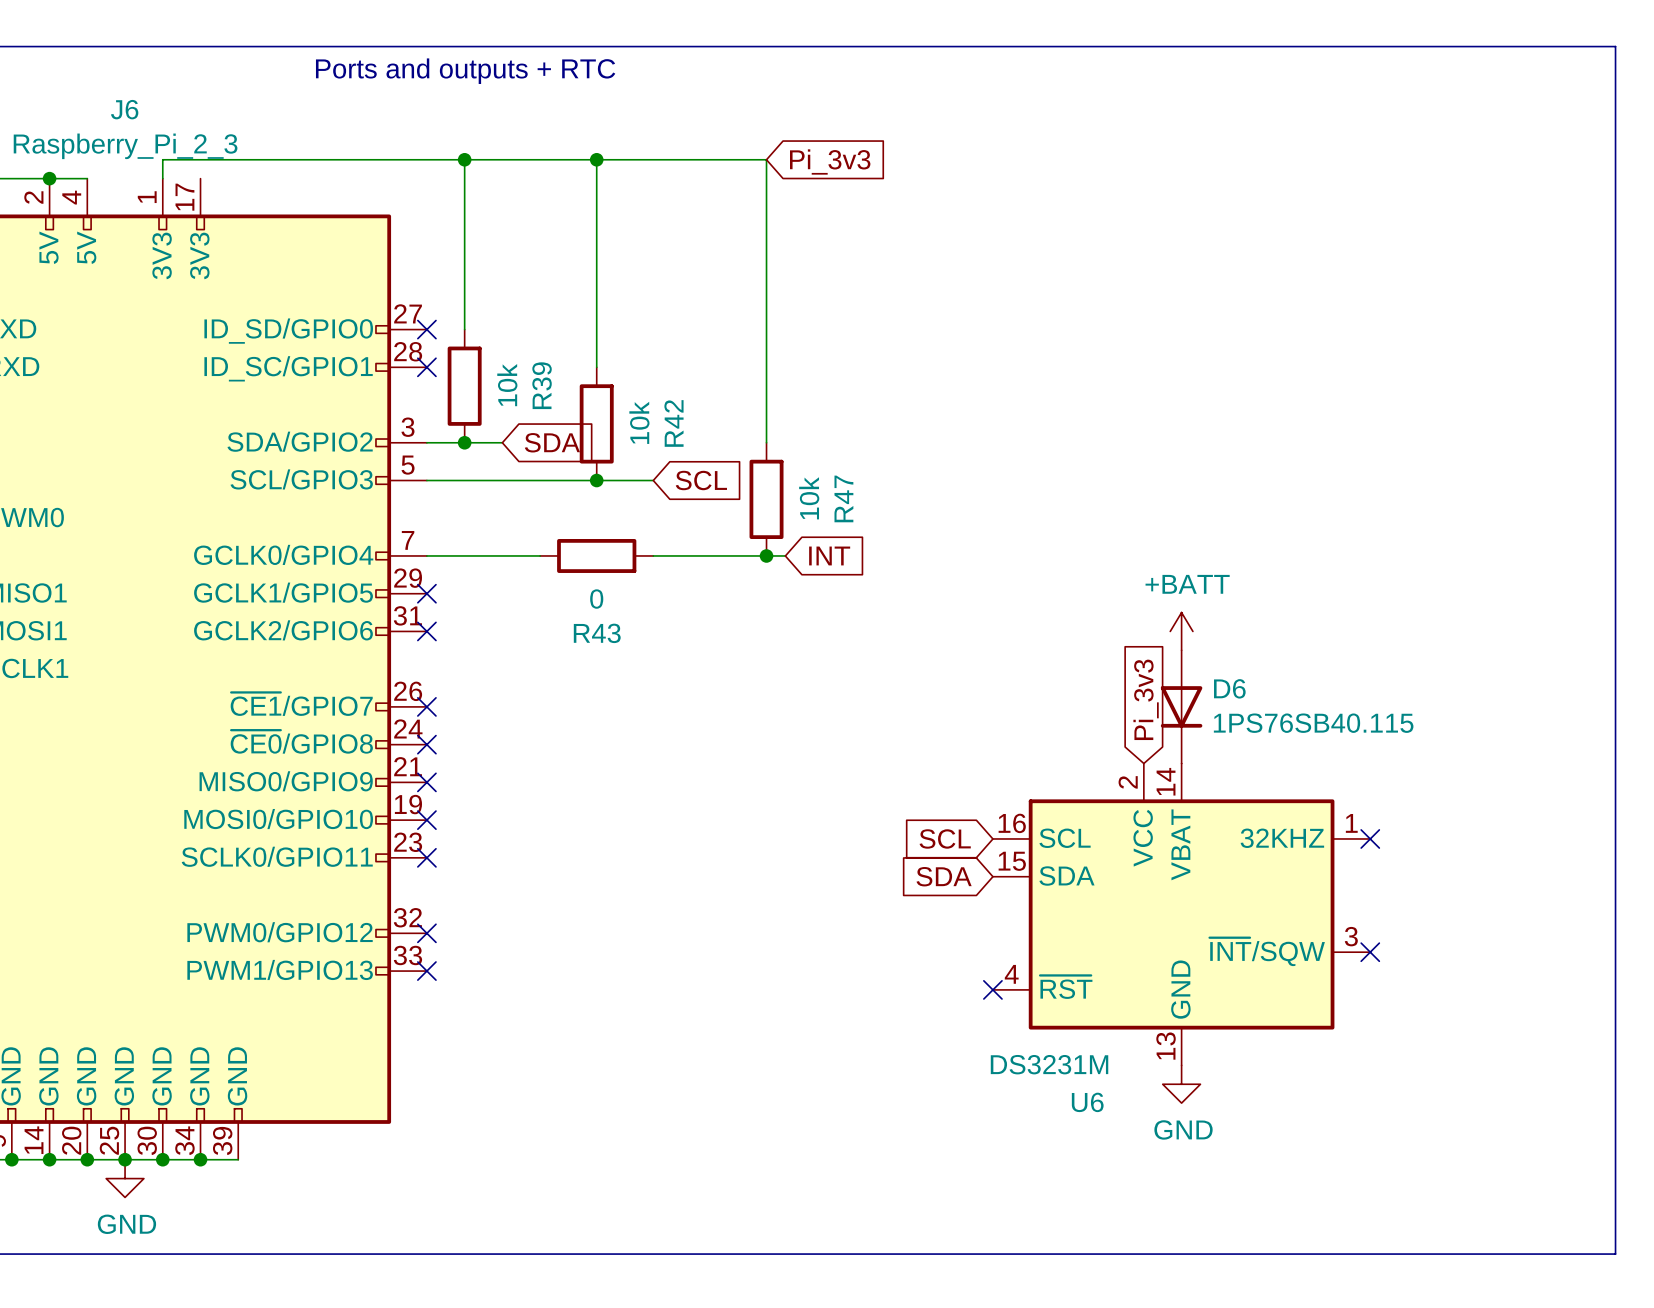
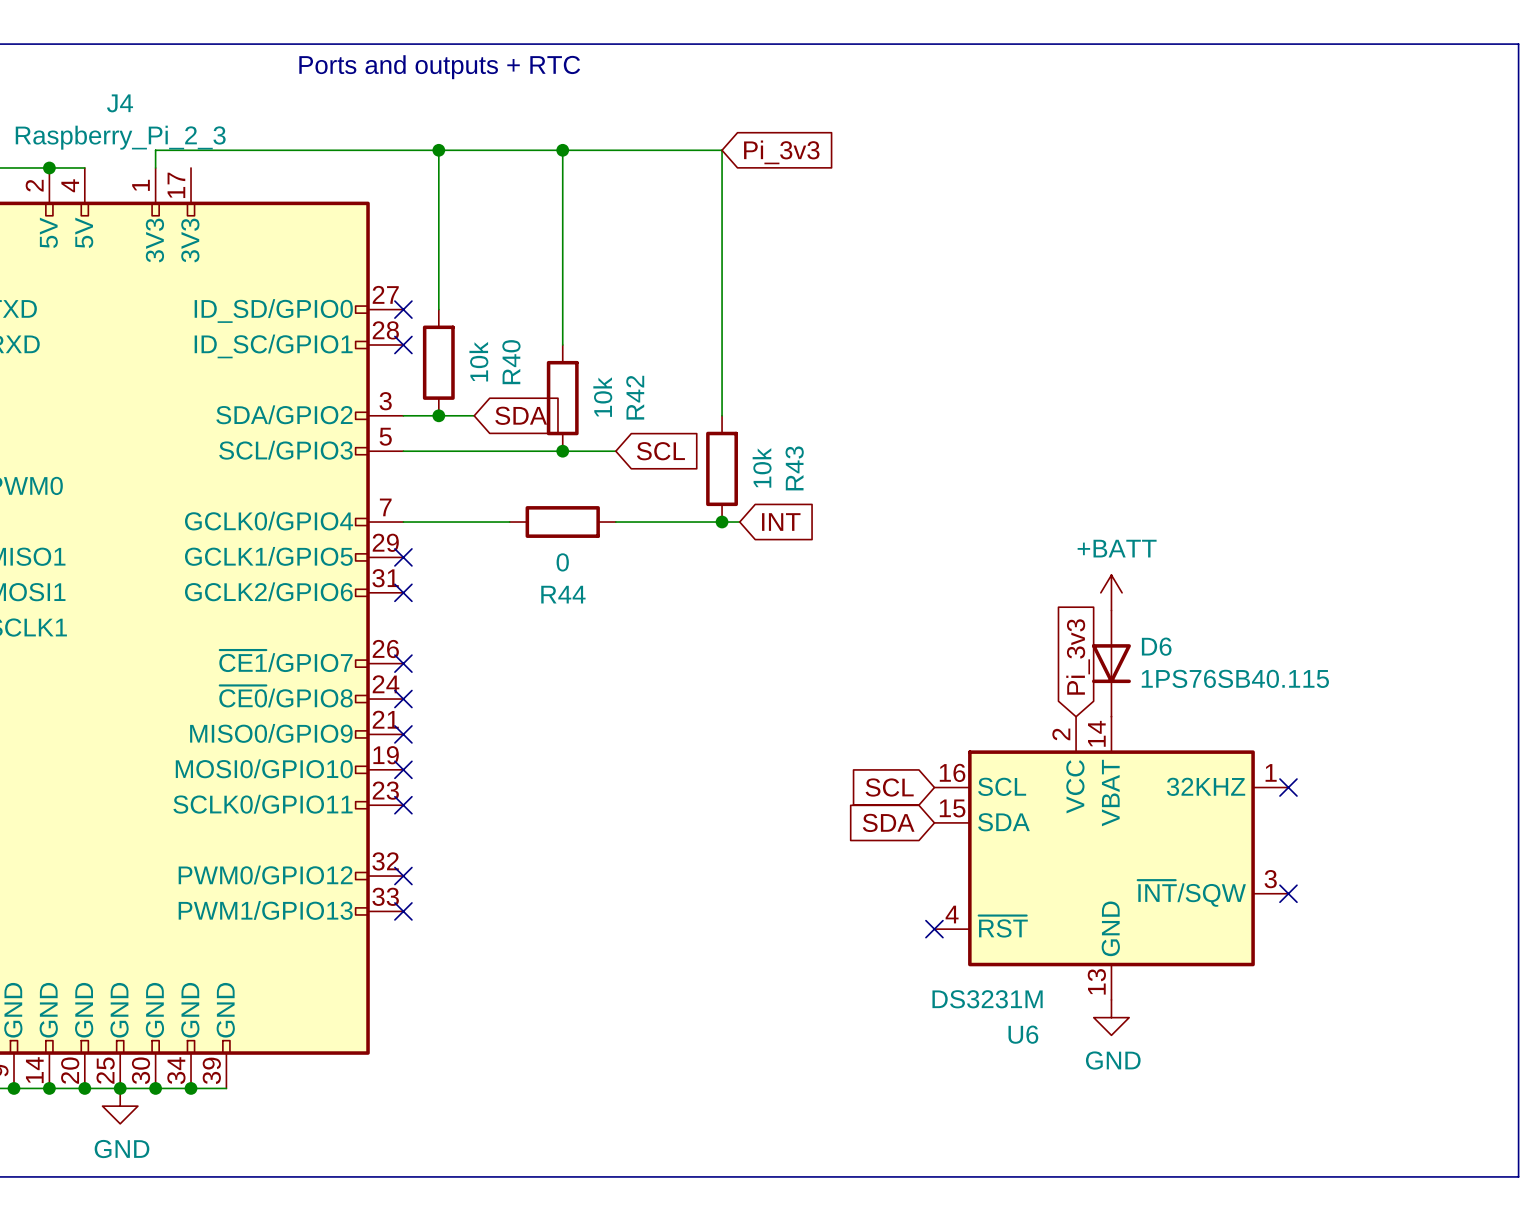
J6 name: J6 (124, 109) -> J4 (120, 103)
R39 name: R39 (542, 385) -> R40 (511, 362)
R47 name: R47 (843, 498) -> R43 (794, 468)
R43 name: R43 (597, 633) -> R44 (563, 594)

